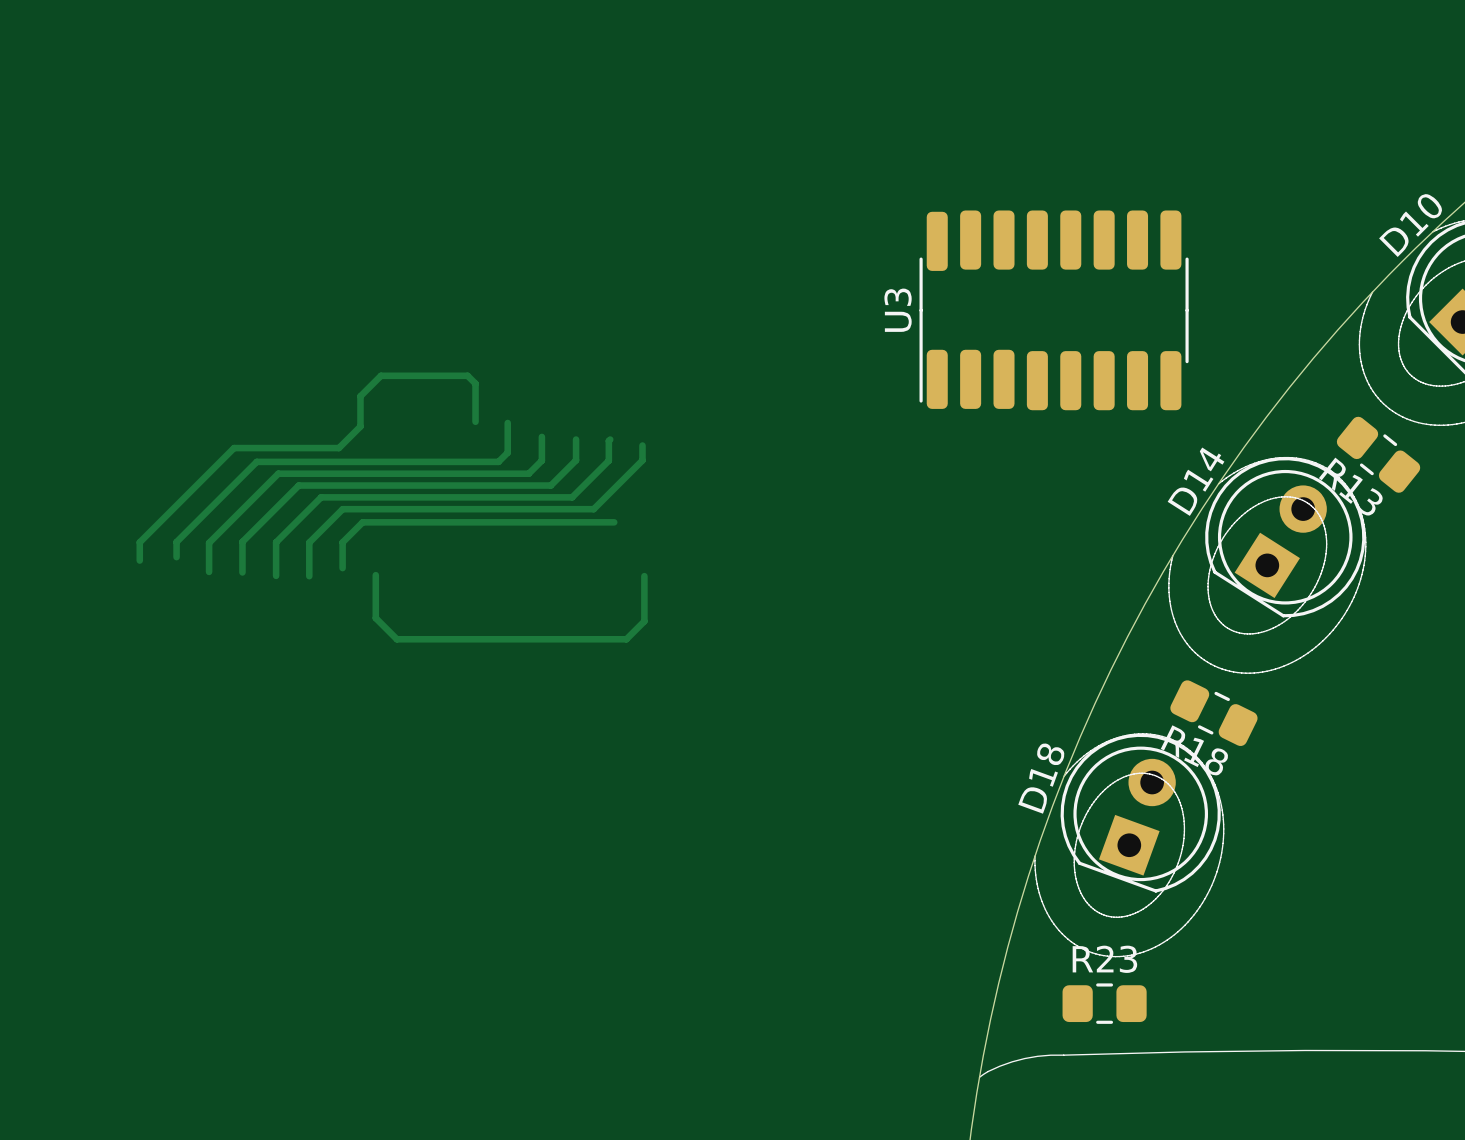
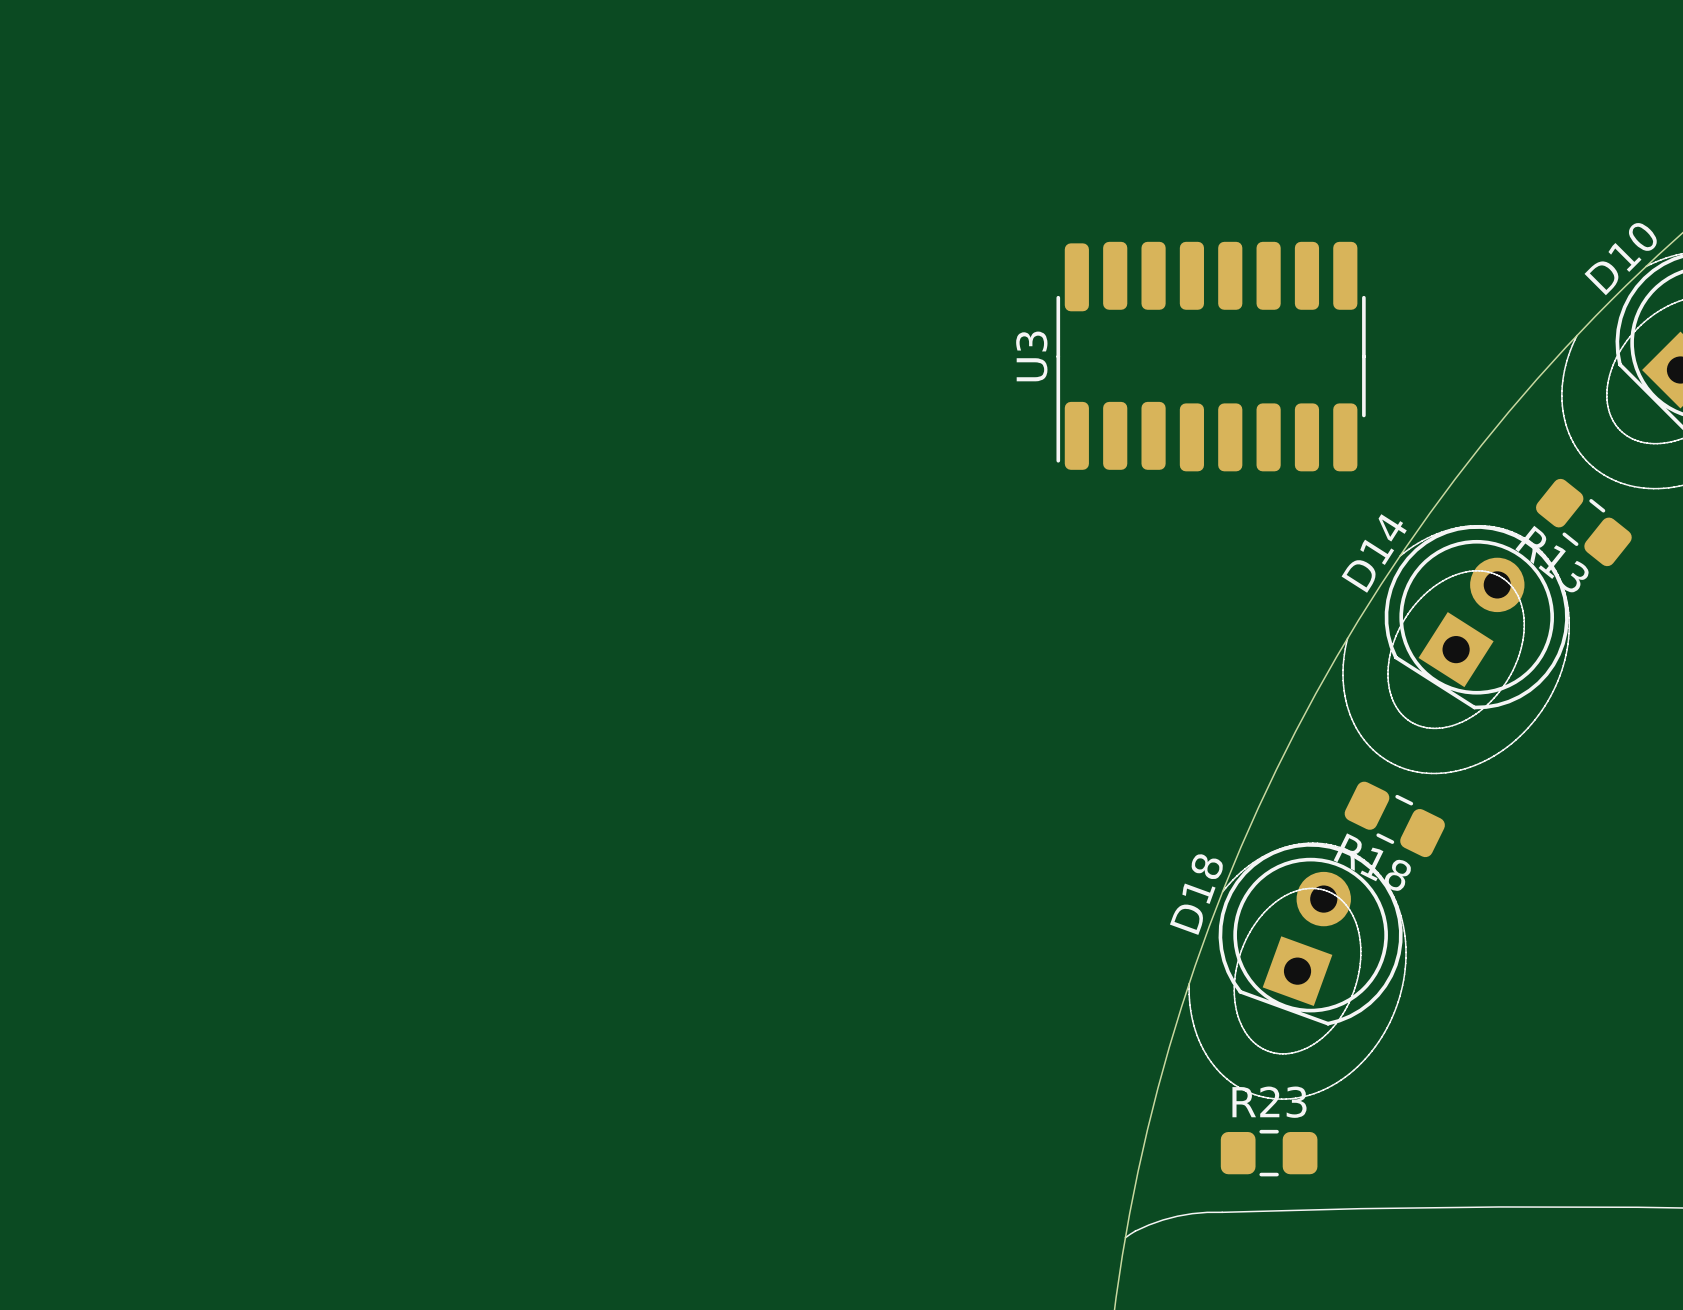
track: (475, 421) (475, 383) (467, 375) (380, 375) (360, 396) (360, 426) (338, 448) (234, 448) (139, 542) (139, 560) -> none
track: (507, 422) (507, 452) (498, 461) (256, 461) (176, 542) (176, 557) -> none
track: (541, 436) (541, 460) (528, 473) (278, 473) (209, 542) (209, 571) -> none
track: (576, 439) (576, 460) (550, 485) (298, 485) (242, 541) (242, 572) -> none
track: (610, 439) (608, 460) (572, 497) (321, 497) (276, 542) (276, 575) -> none
track: (642, 445) (642, 460) (593, 509) (342, 509) (309, 542) (309, 576) -> none
track: (614, 522) (362, 522) (342, 542) (342, 568) -> none
track: (375, 575) (375, 618) (396, 639) (626, 639) (644, 621) (644, 576) -> none

